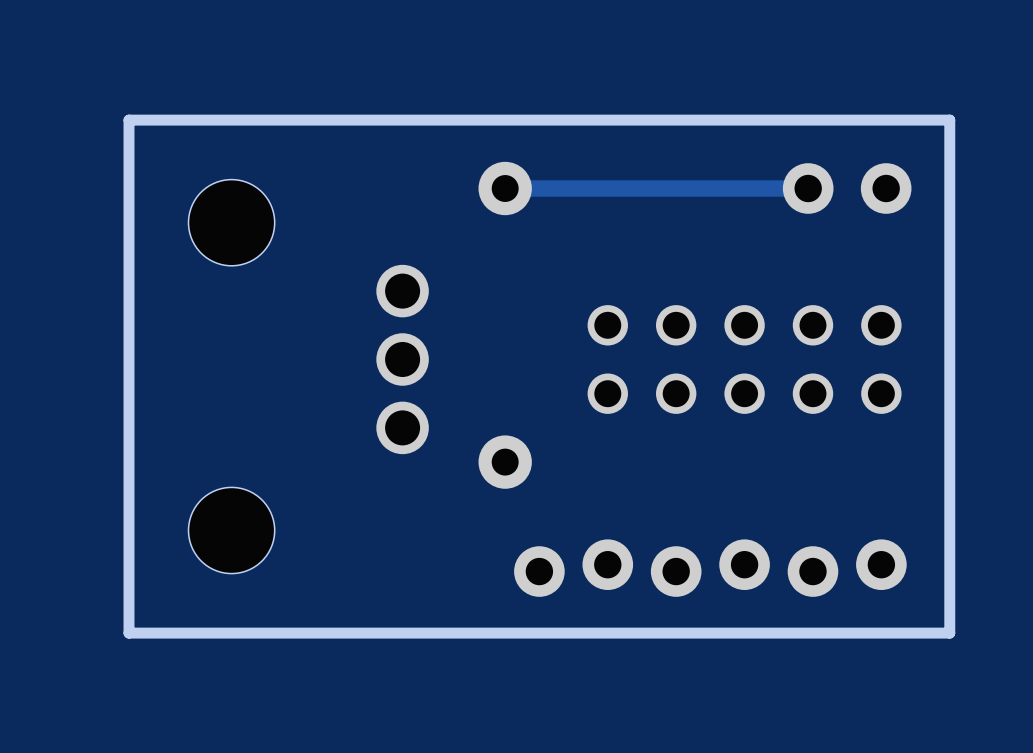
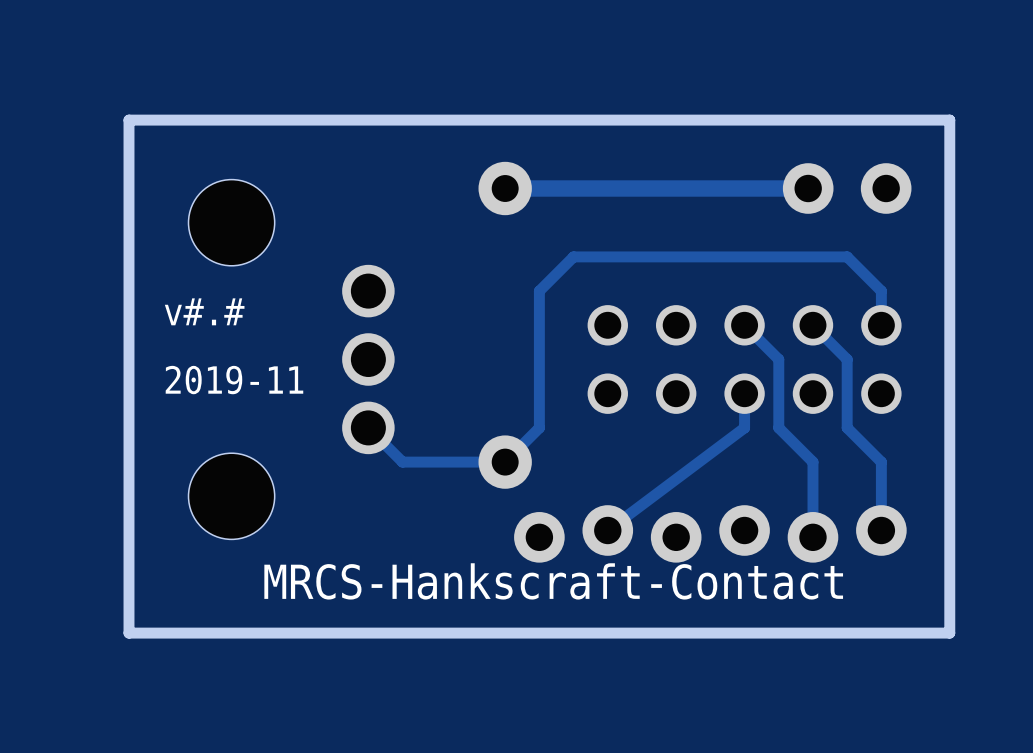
text: none -> v#.# (204, 311)
track: none -> (744, 325) (778, 359) (778, 427) (812, 462) (812, 537)
track: none -> (812, 325) (847, 359) (847, 427) (881, 462) (881, 530)
track: none -> (881, 325) (881, 291) (847, 256) (573, 256) (539, 291) (539, 427) (505, 462) (402, 462) (368, 427)
part position: (402, 359) -> (368, 359)
text: none -> 2019-11 (234, 380)
track: none -> (744, 393) (744, 427) (607, 530)
hole position: (231, 530) -> (231, 496)
part position: (710, 568) -> (710, 533)
text: none -> MRCS-Hankscraft-Contact (553, 581)

